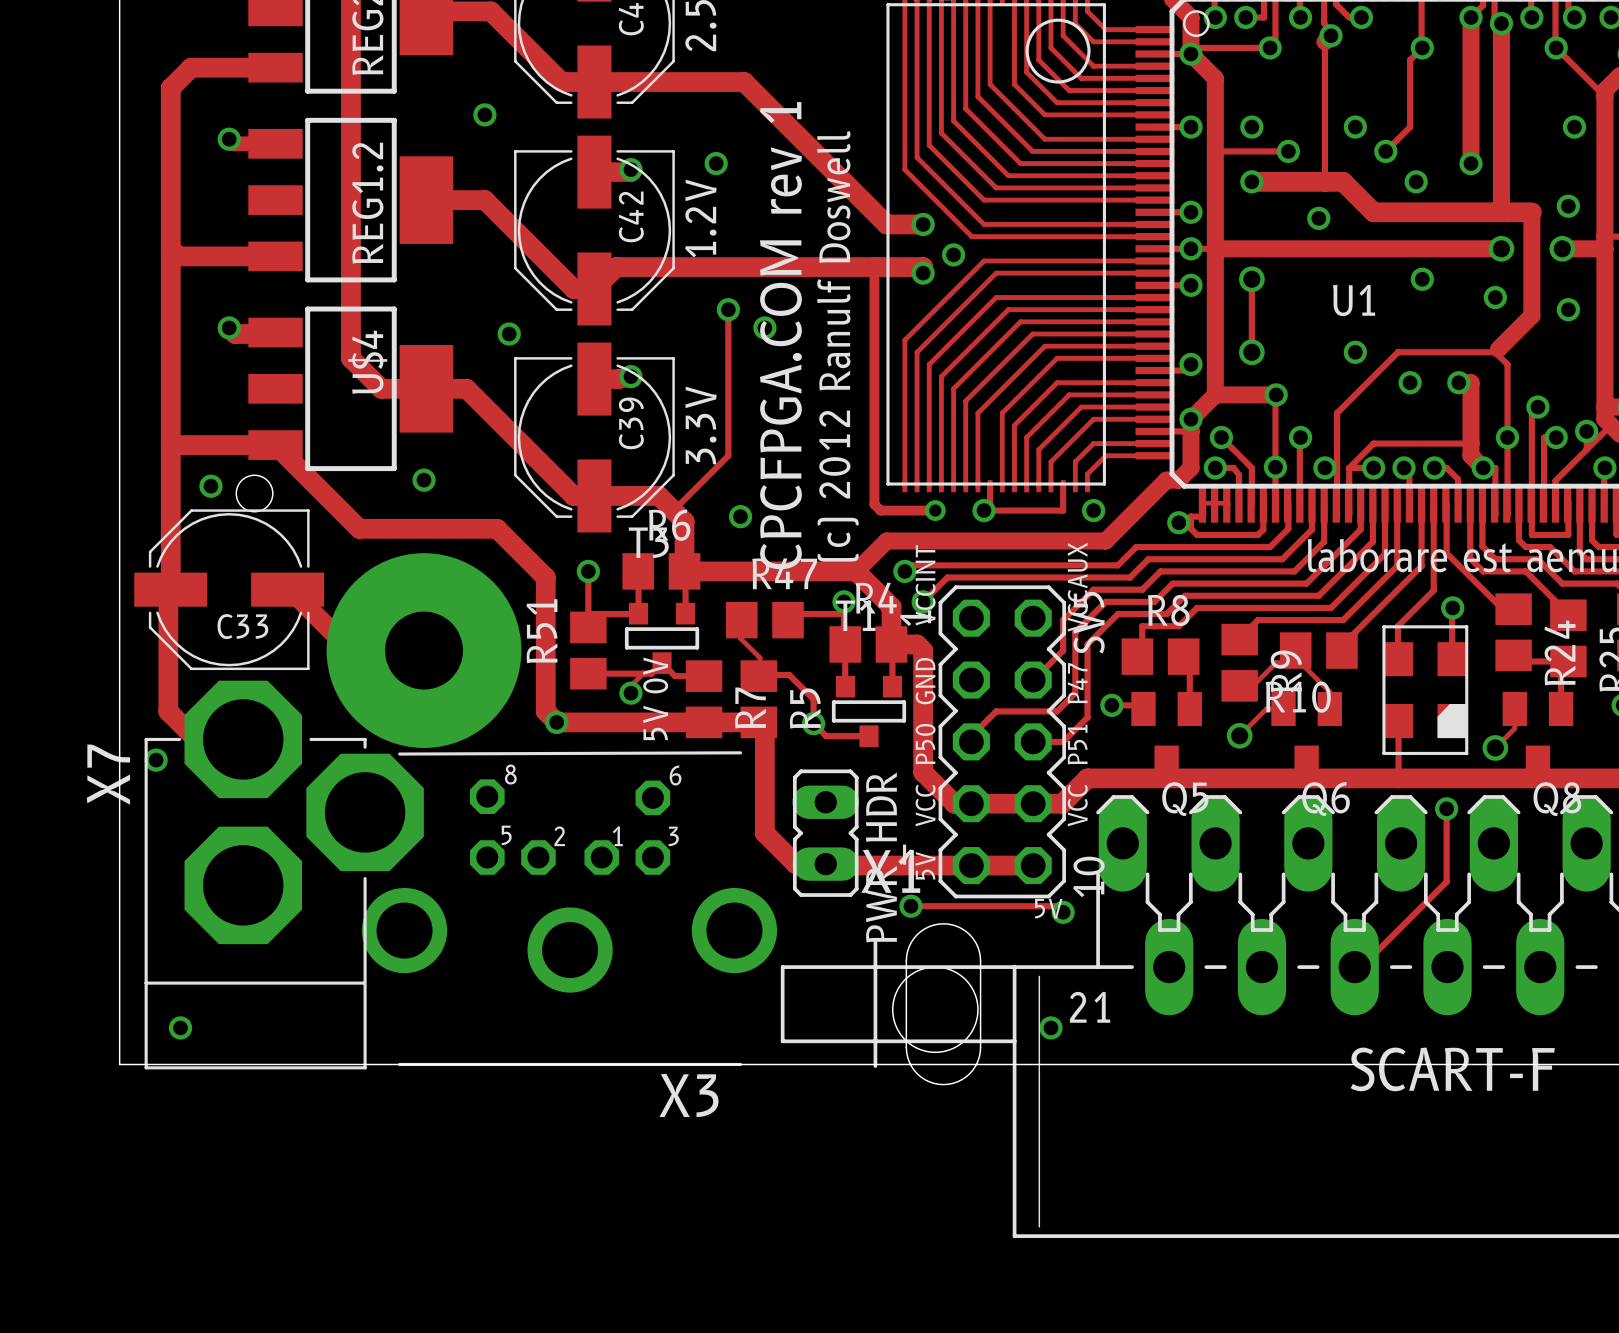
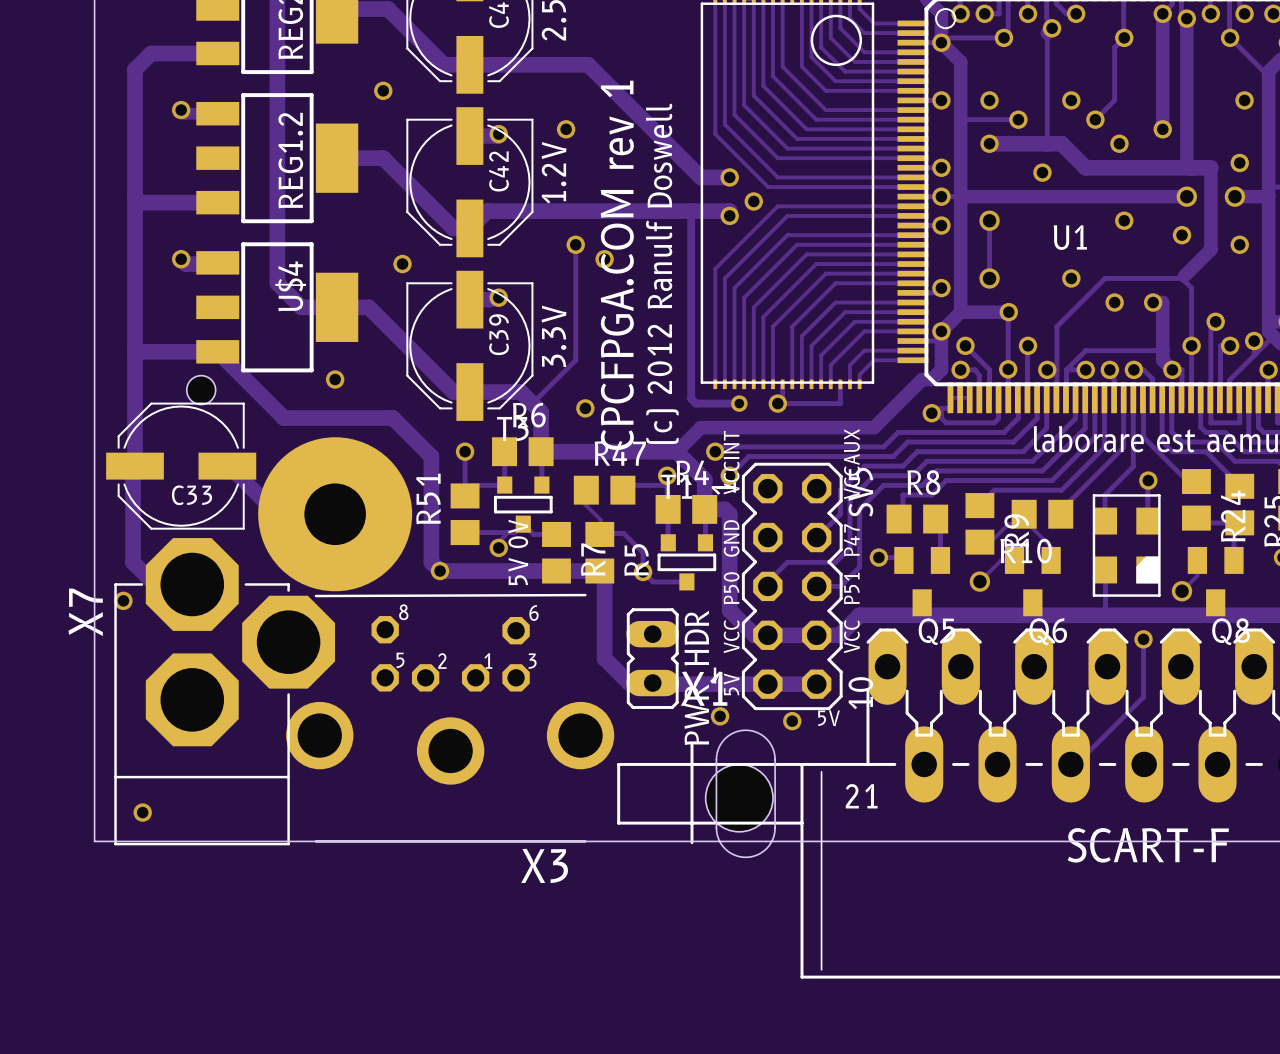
via: (210, 486) -> none
via: (1093, 510) -> none
track: (910, 906) (1057, 906) (1063, 912) -> none
via position: (1063, 912) -> (792, 721)
via: (1050, 1027) -> none

